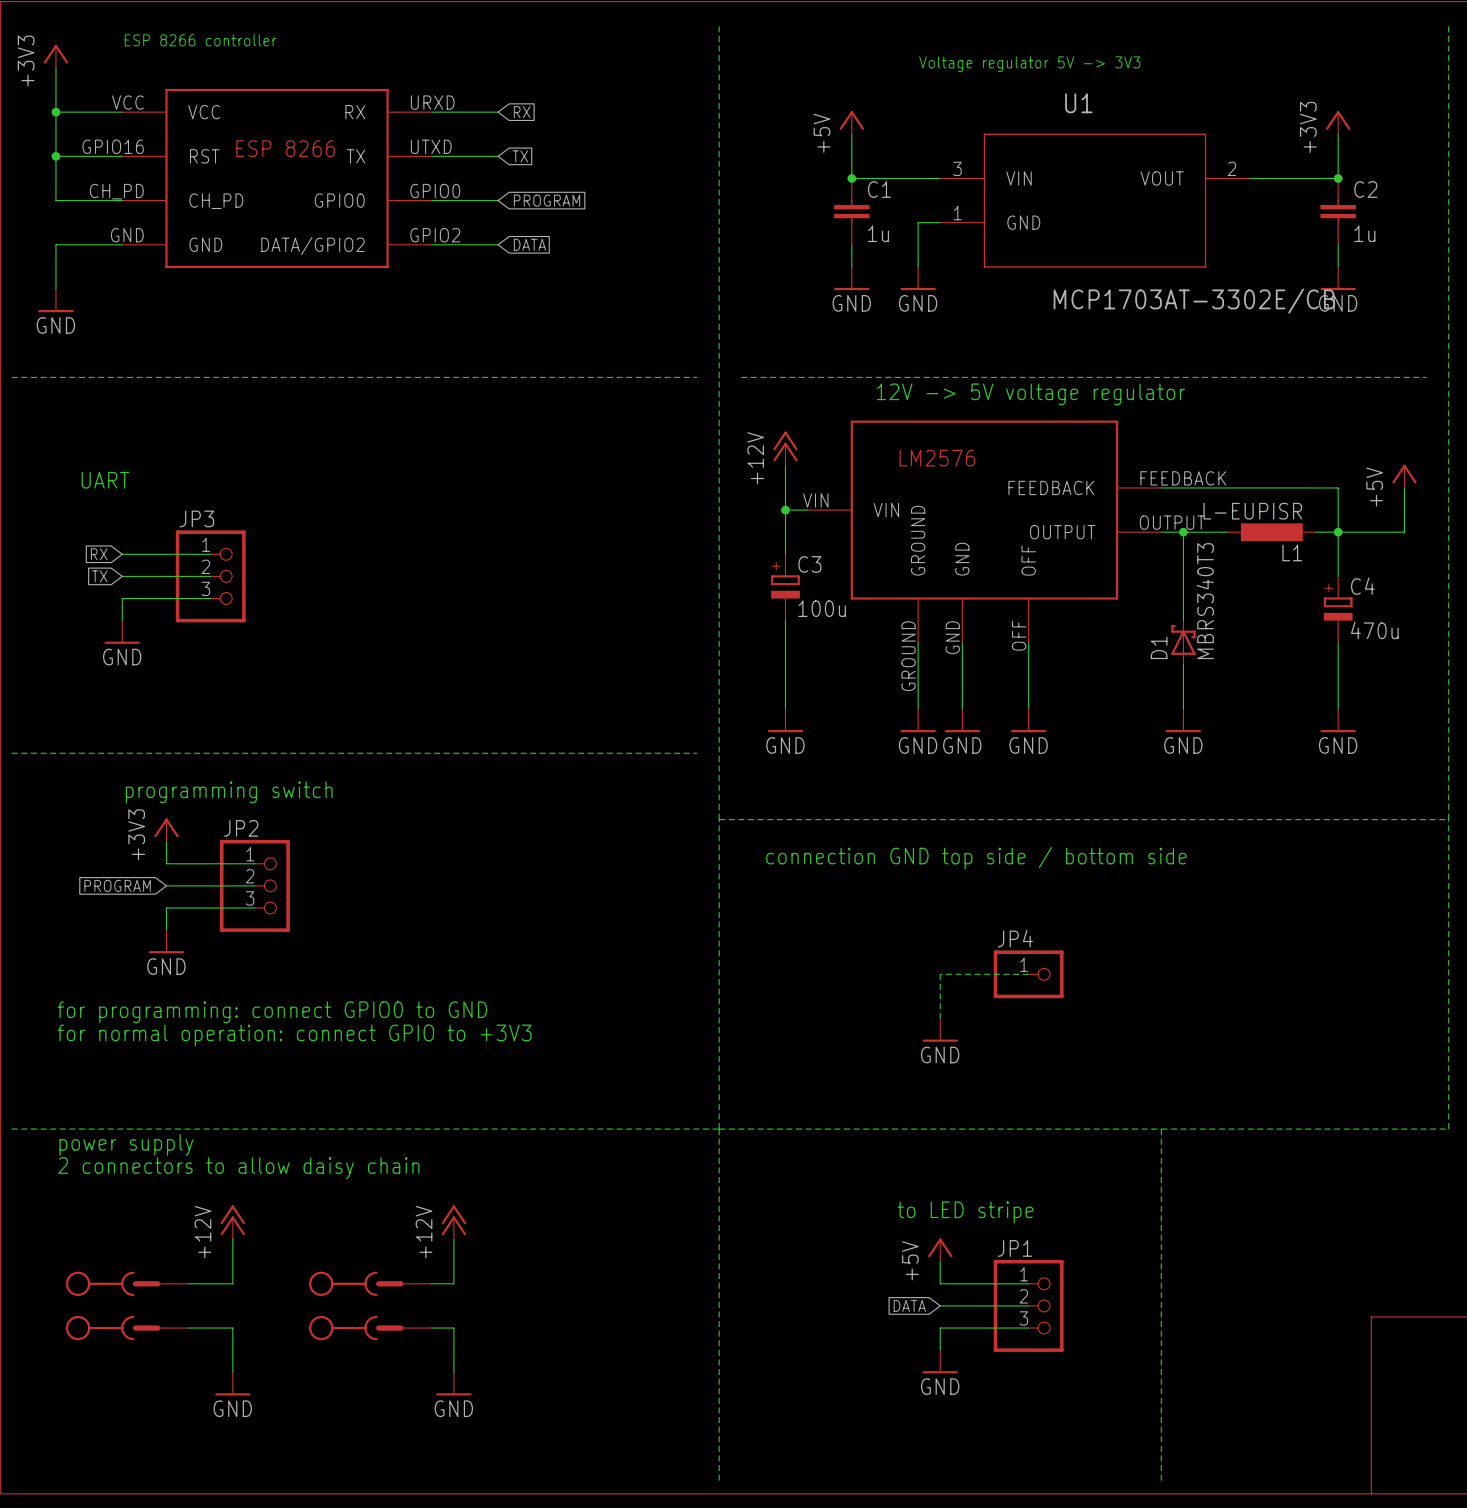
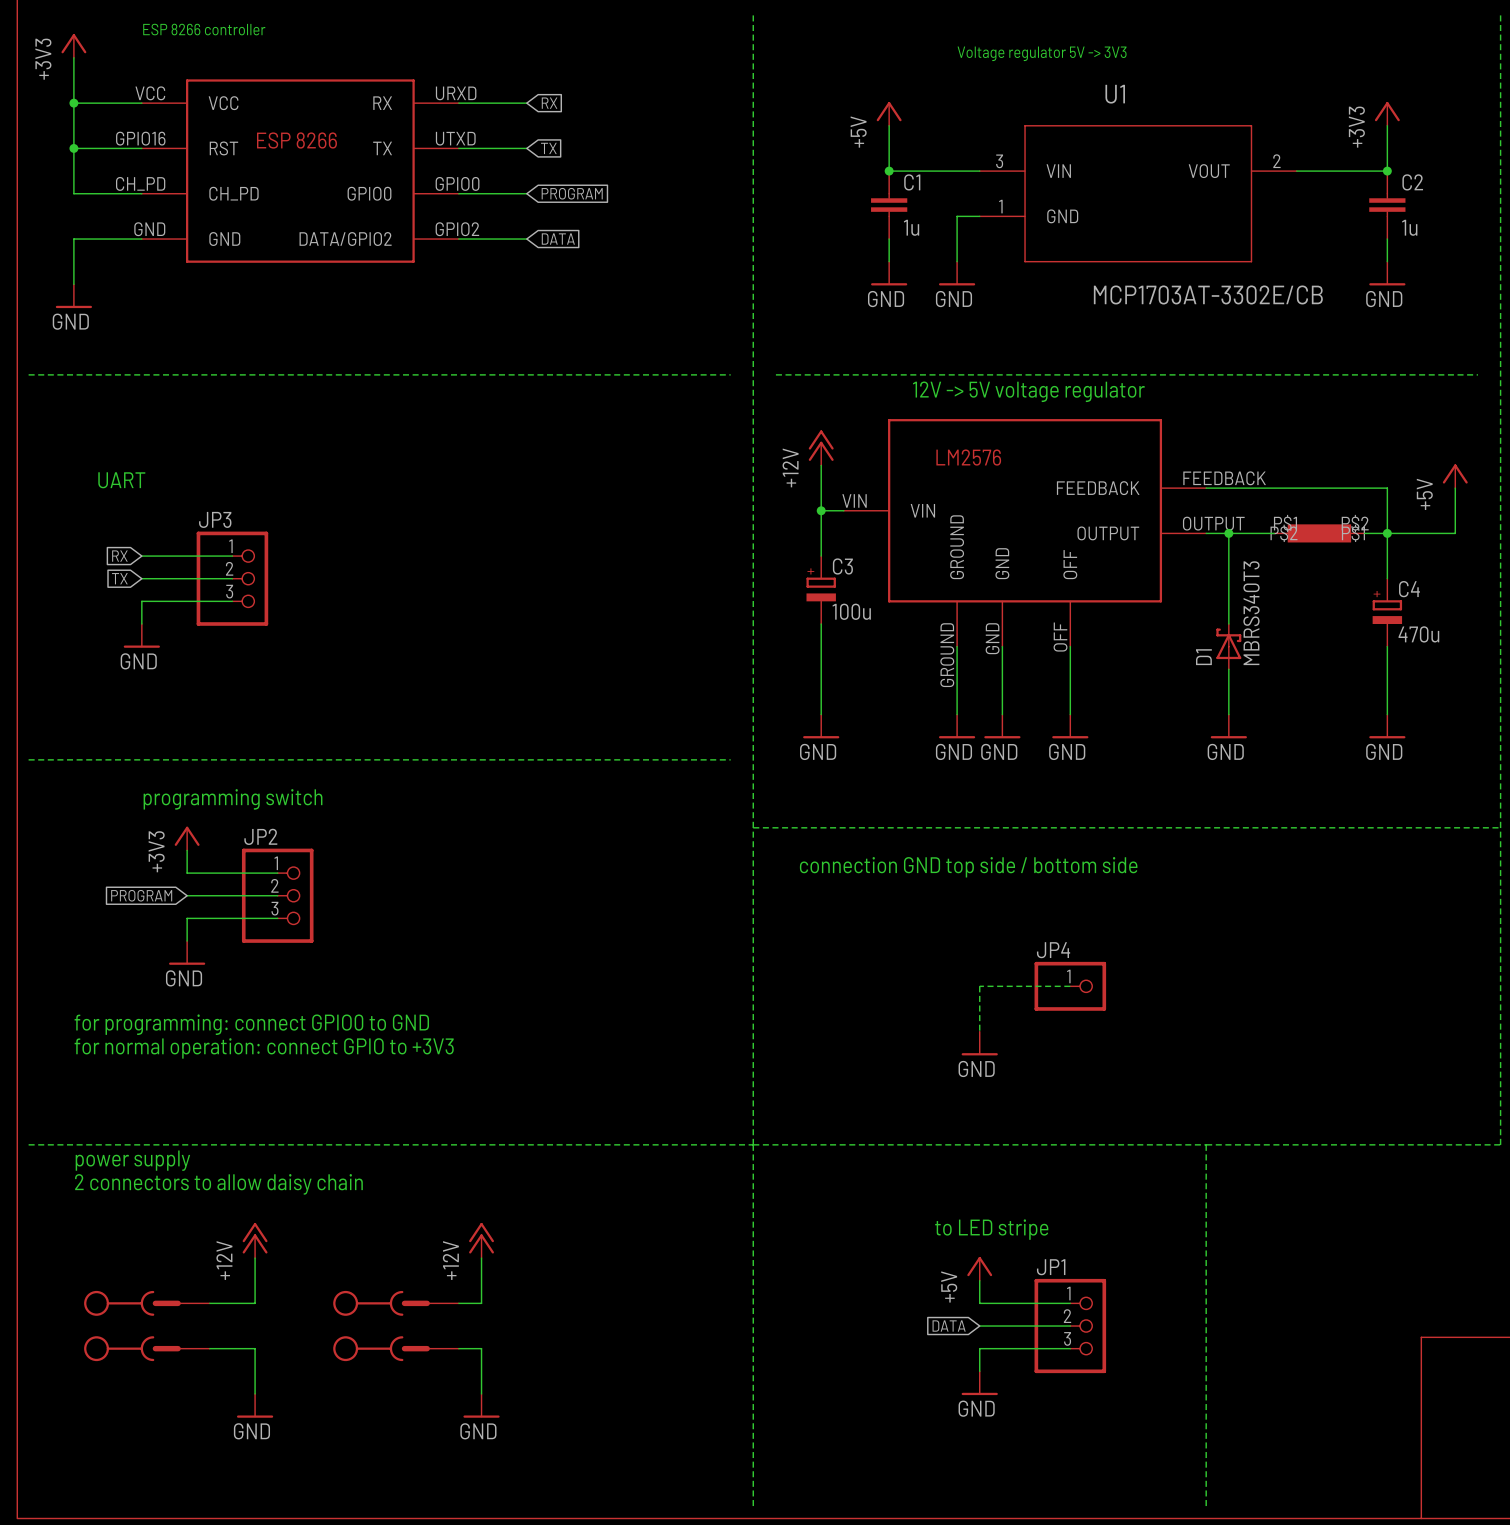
L1: L-EUPISR (1271, 532) -> none
part: none -> (1319, 533)

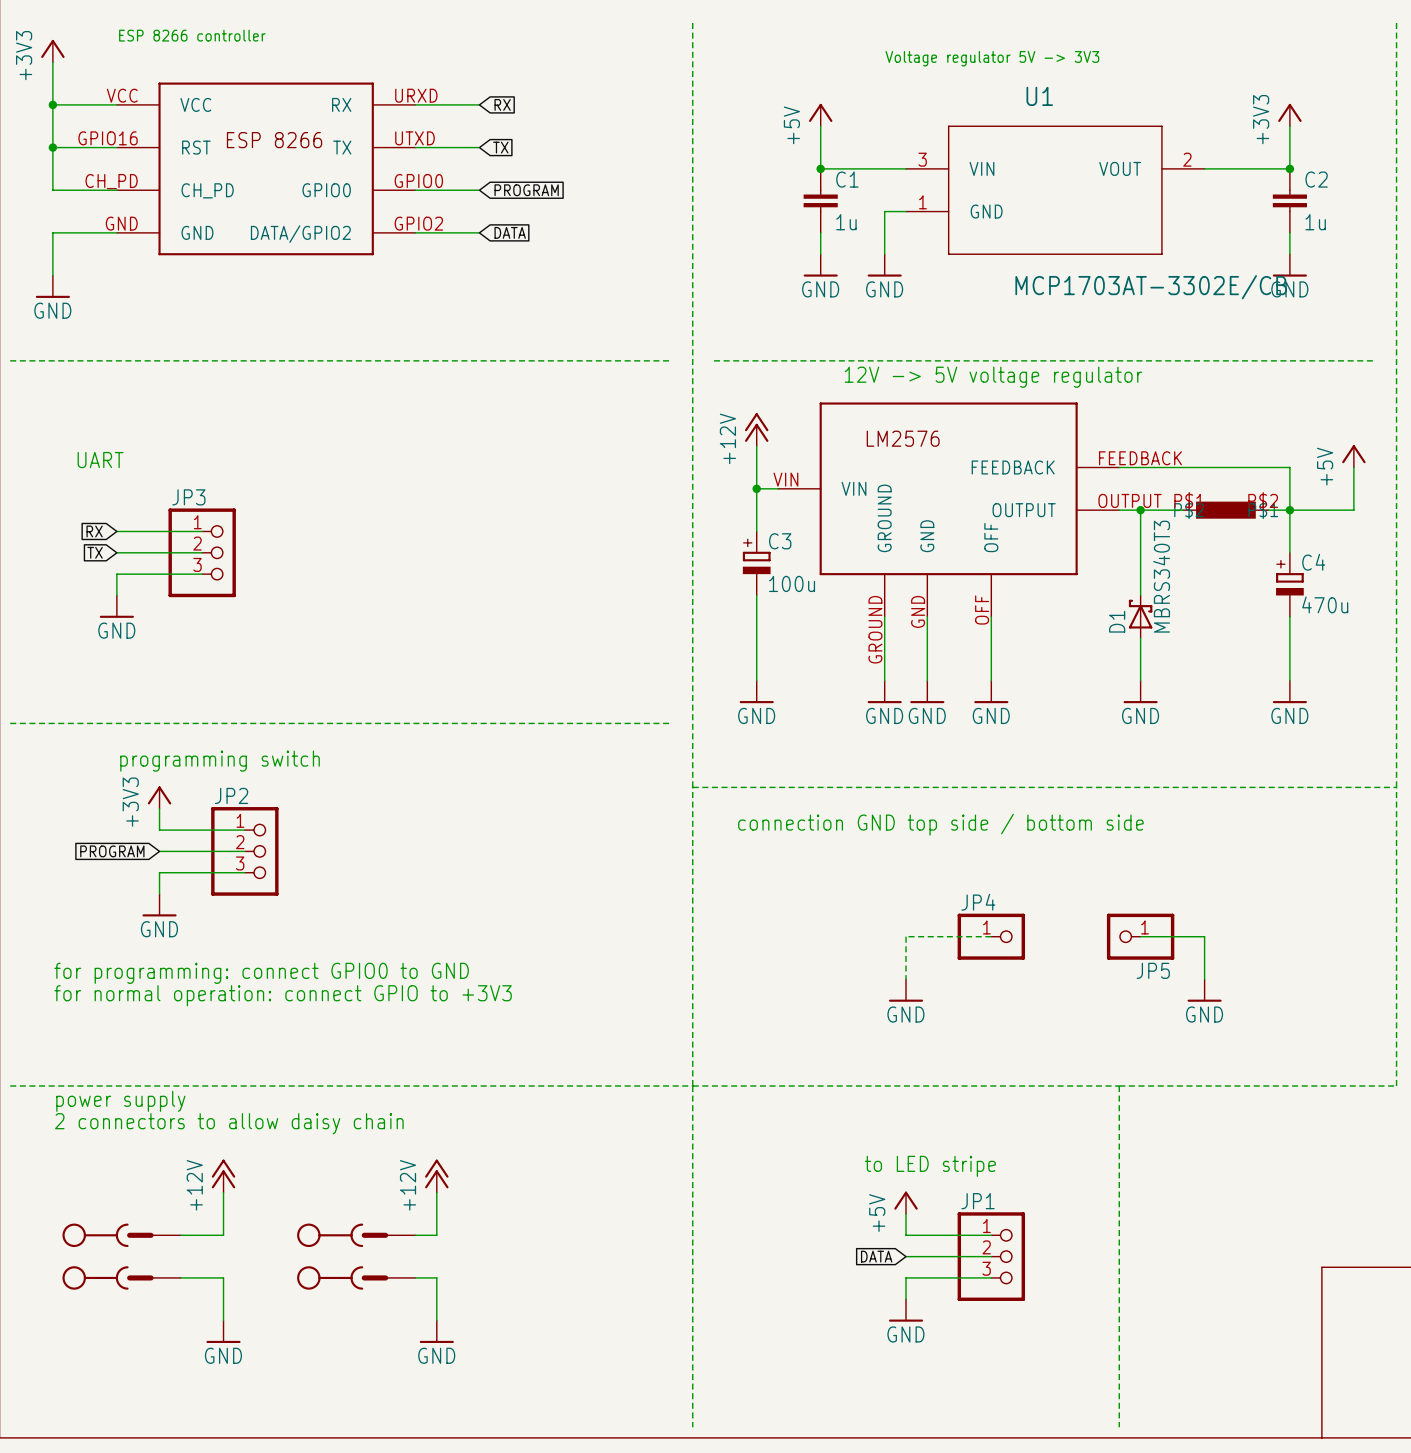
wire: none -> (1140, 936) (1204, 936) (1204, 979)
JP5: none -> (1140, 936)
power symbol: none -> GND (1204, 990)

